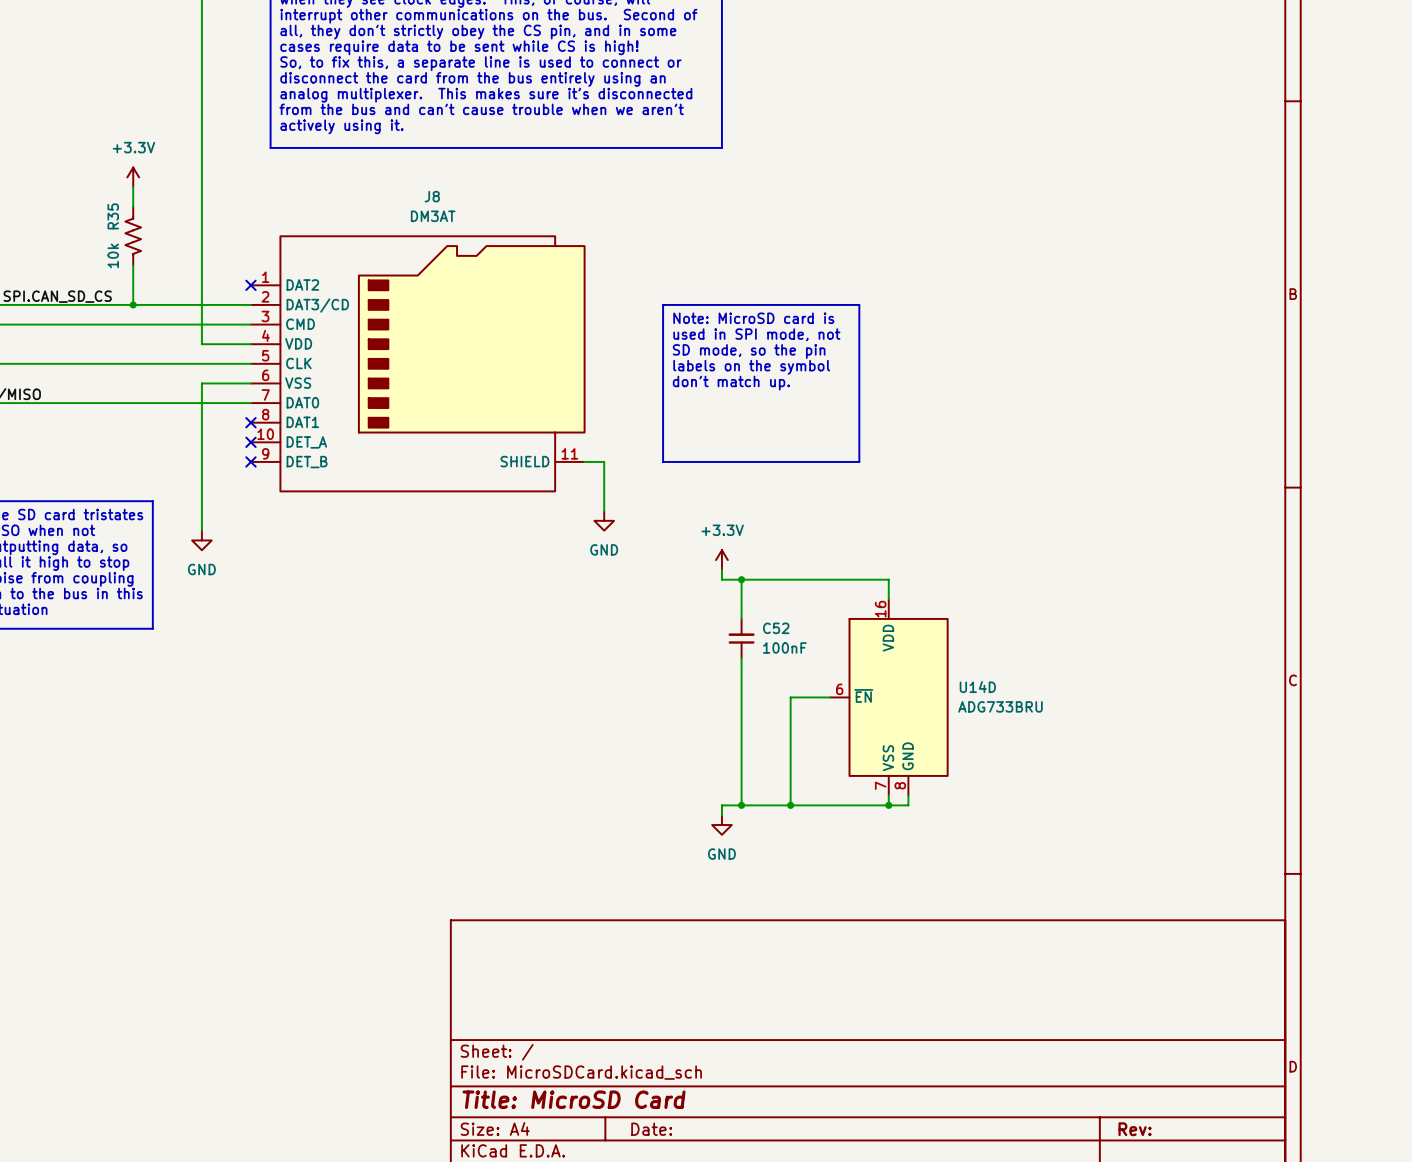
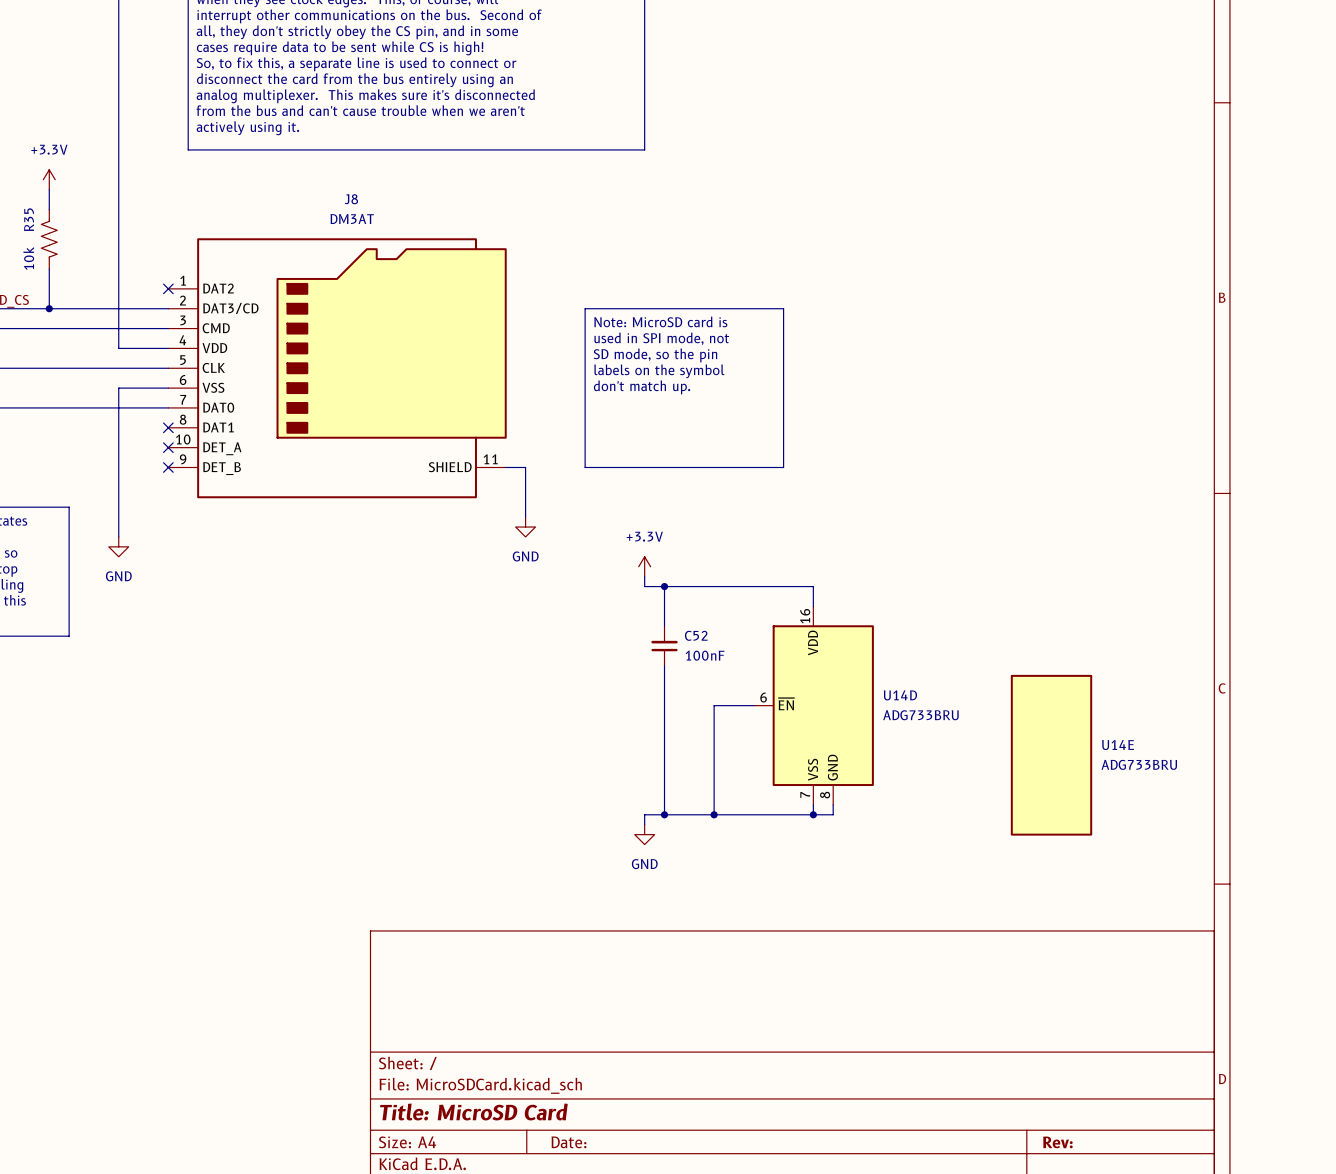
U14E: none -> ADG733BRU (1051, 755)

